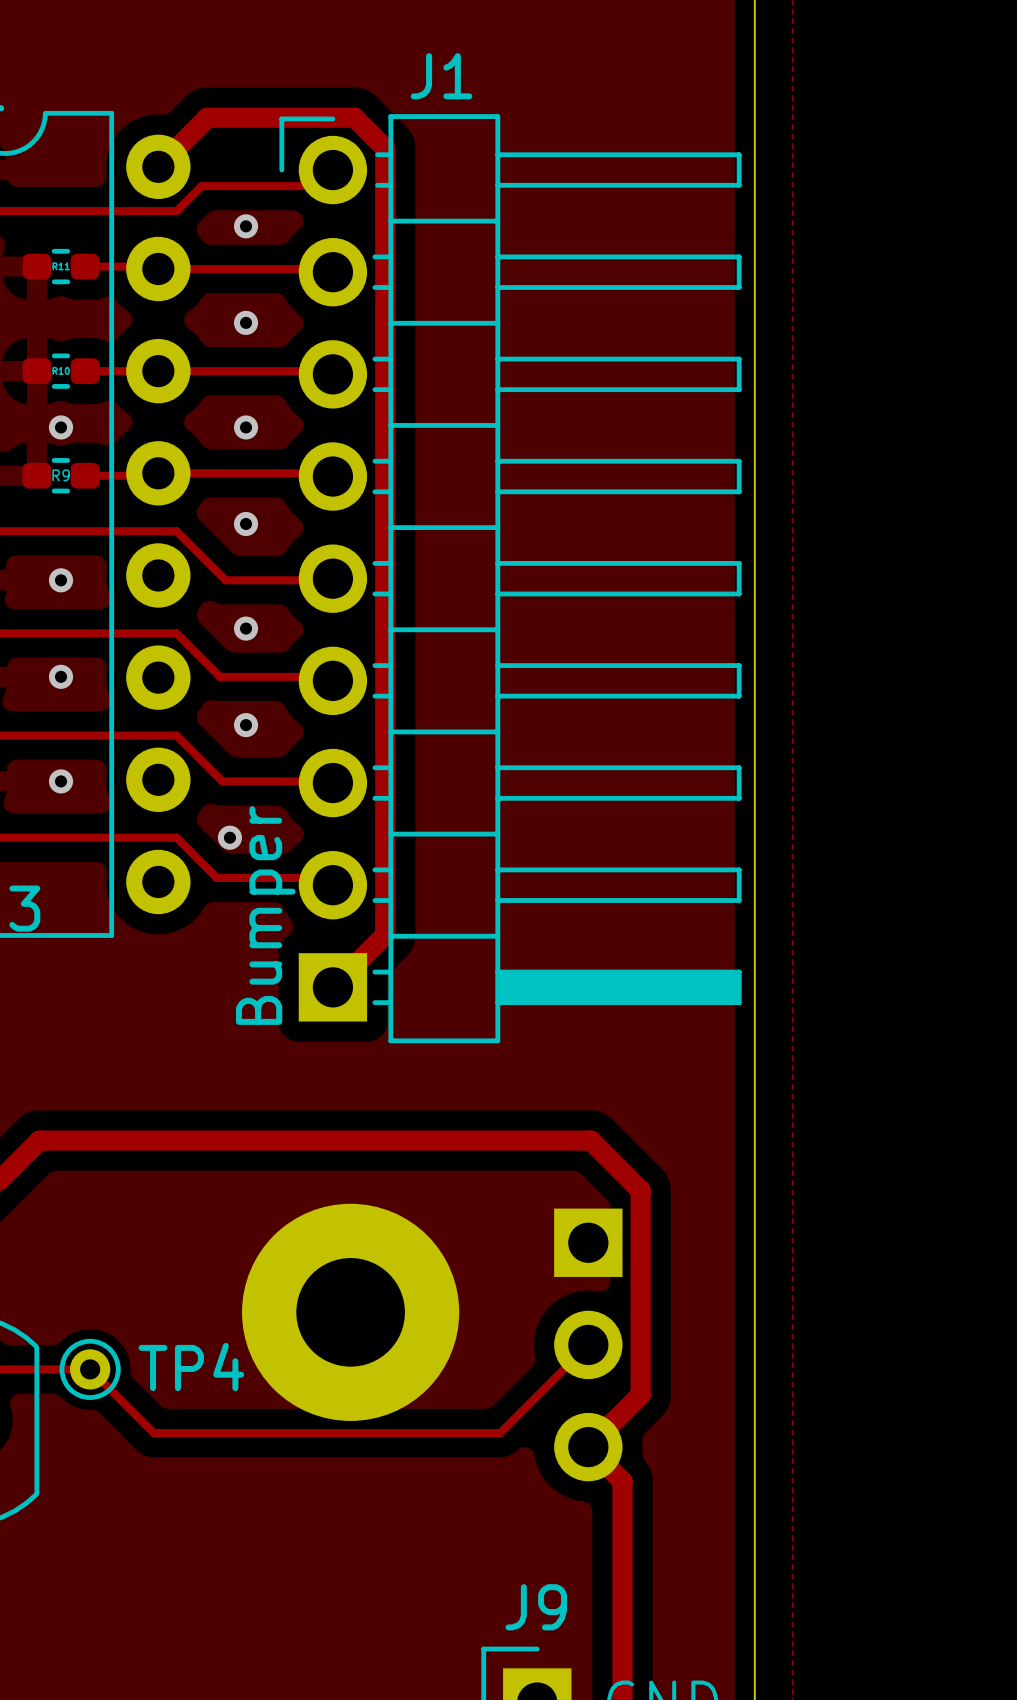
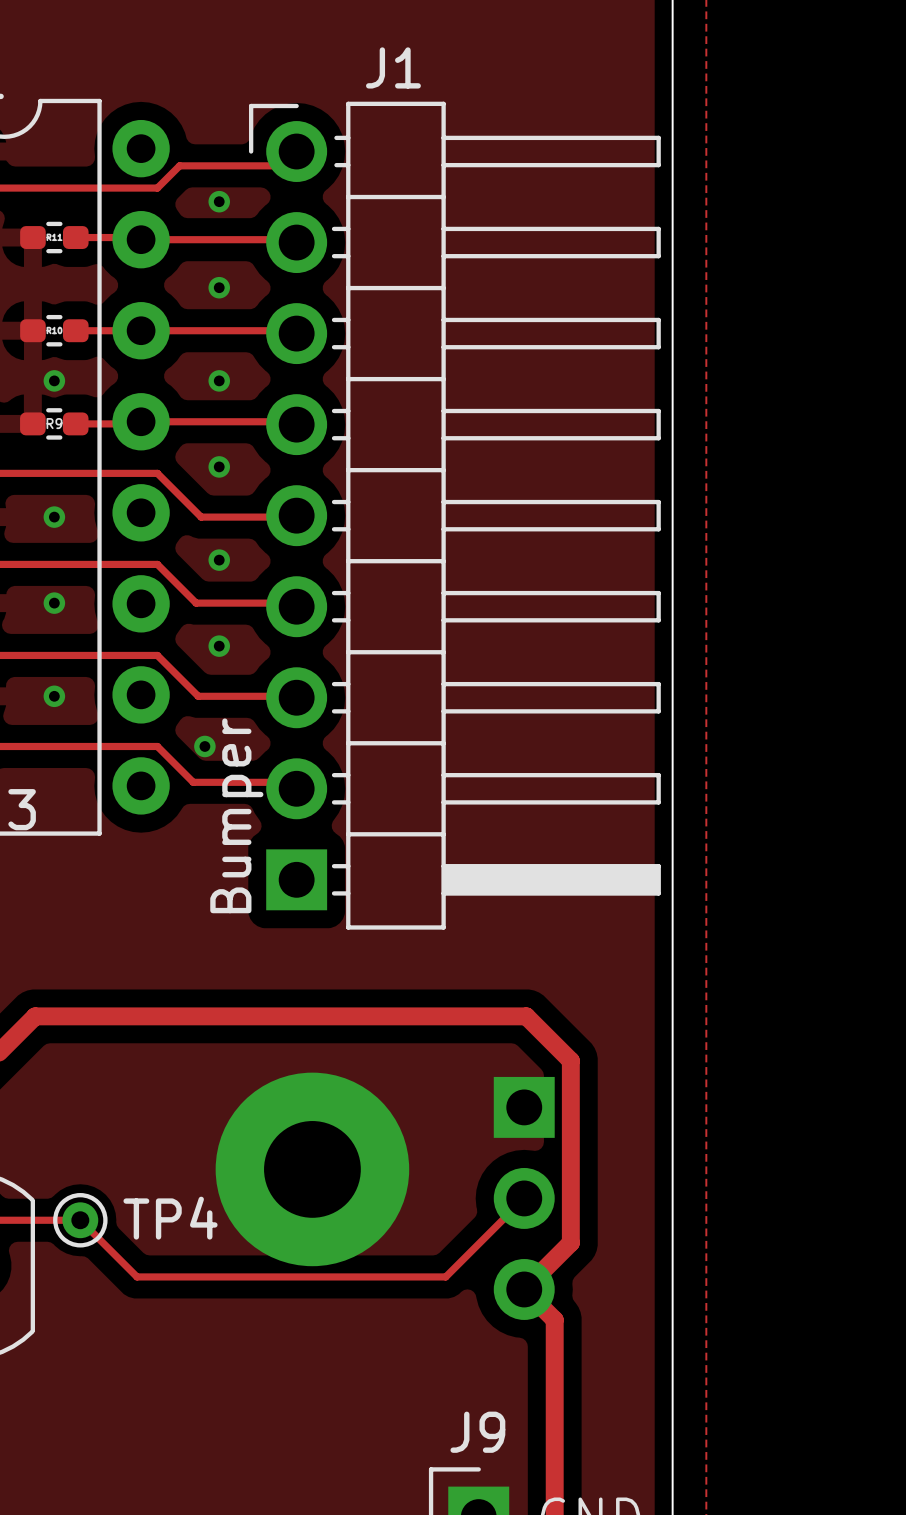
track: (158, 166) (207, 117) (354, 117) (385, 148) (385, 935) (332, 987) -> none

